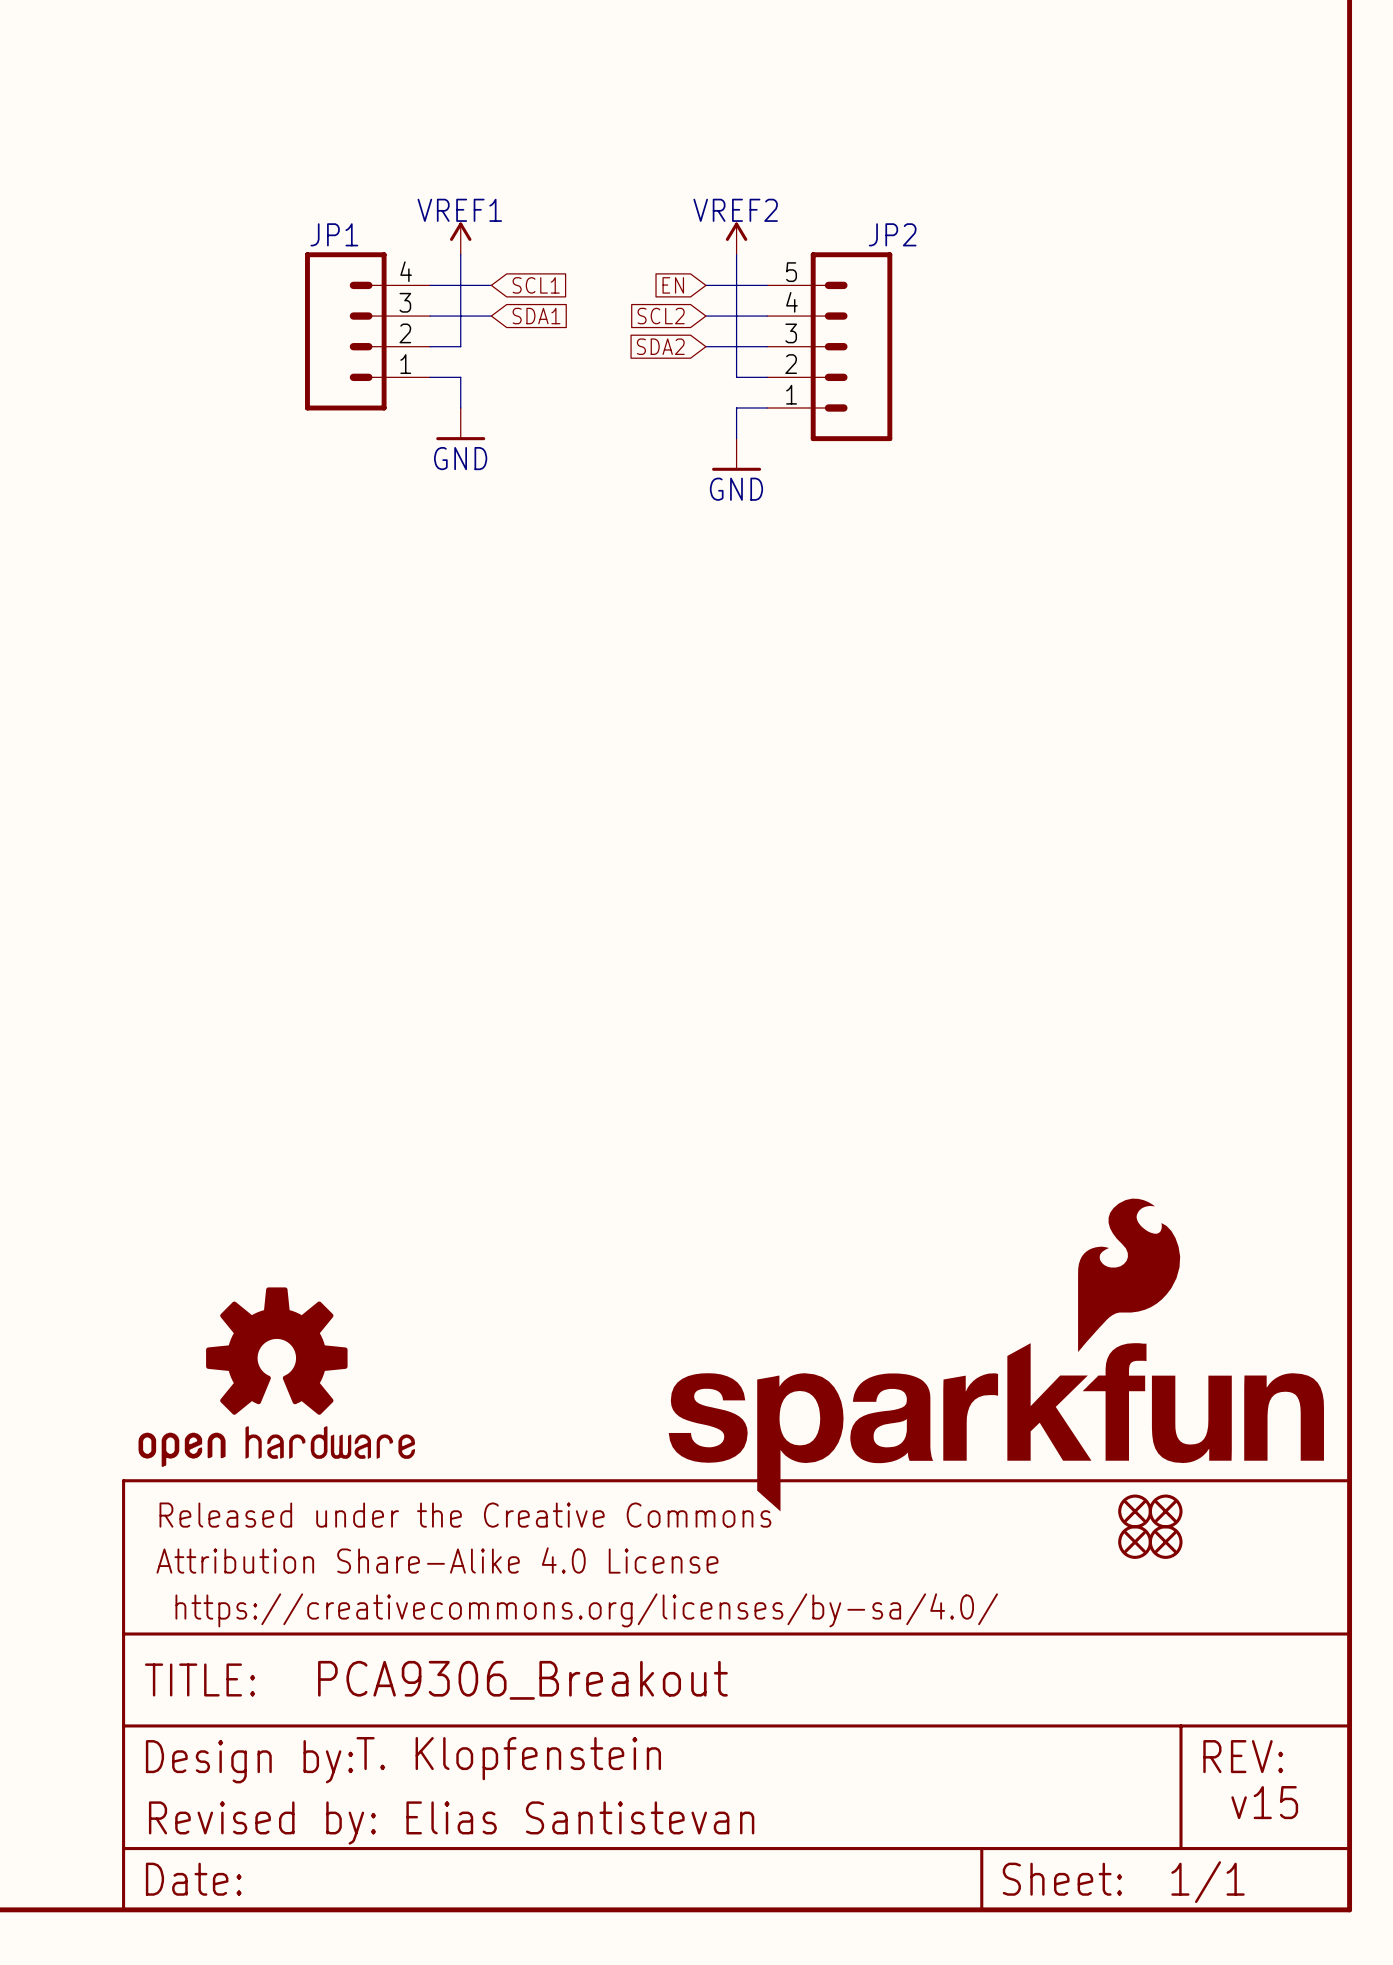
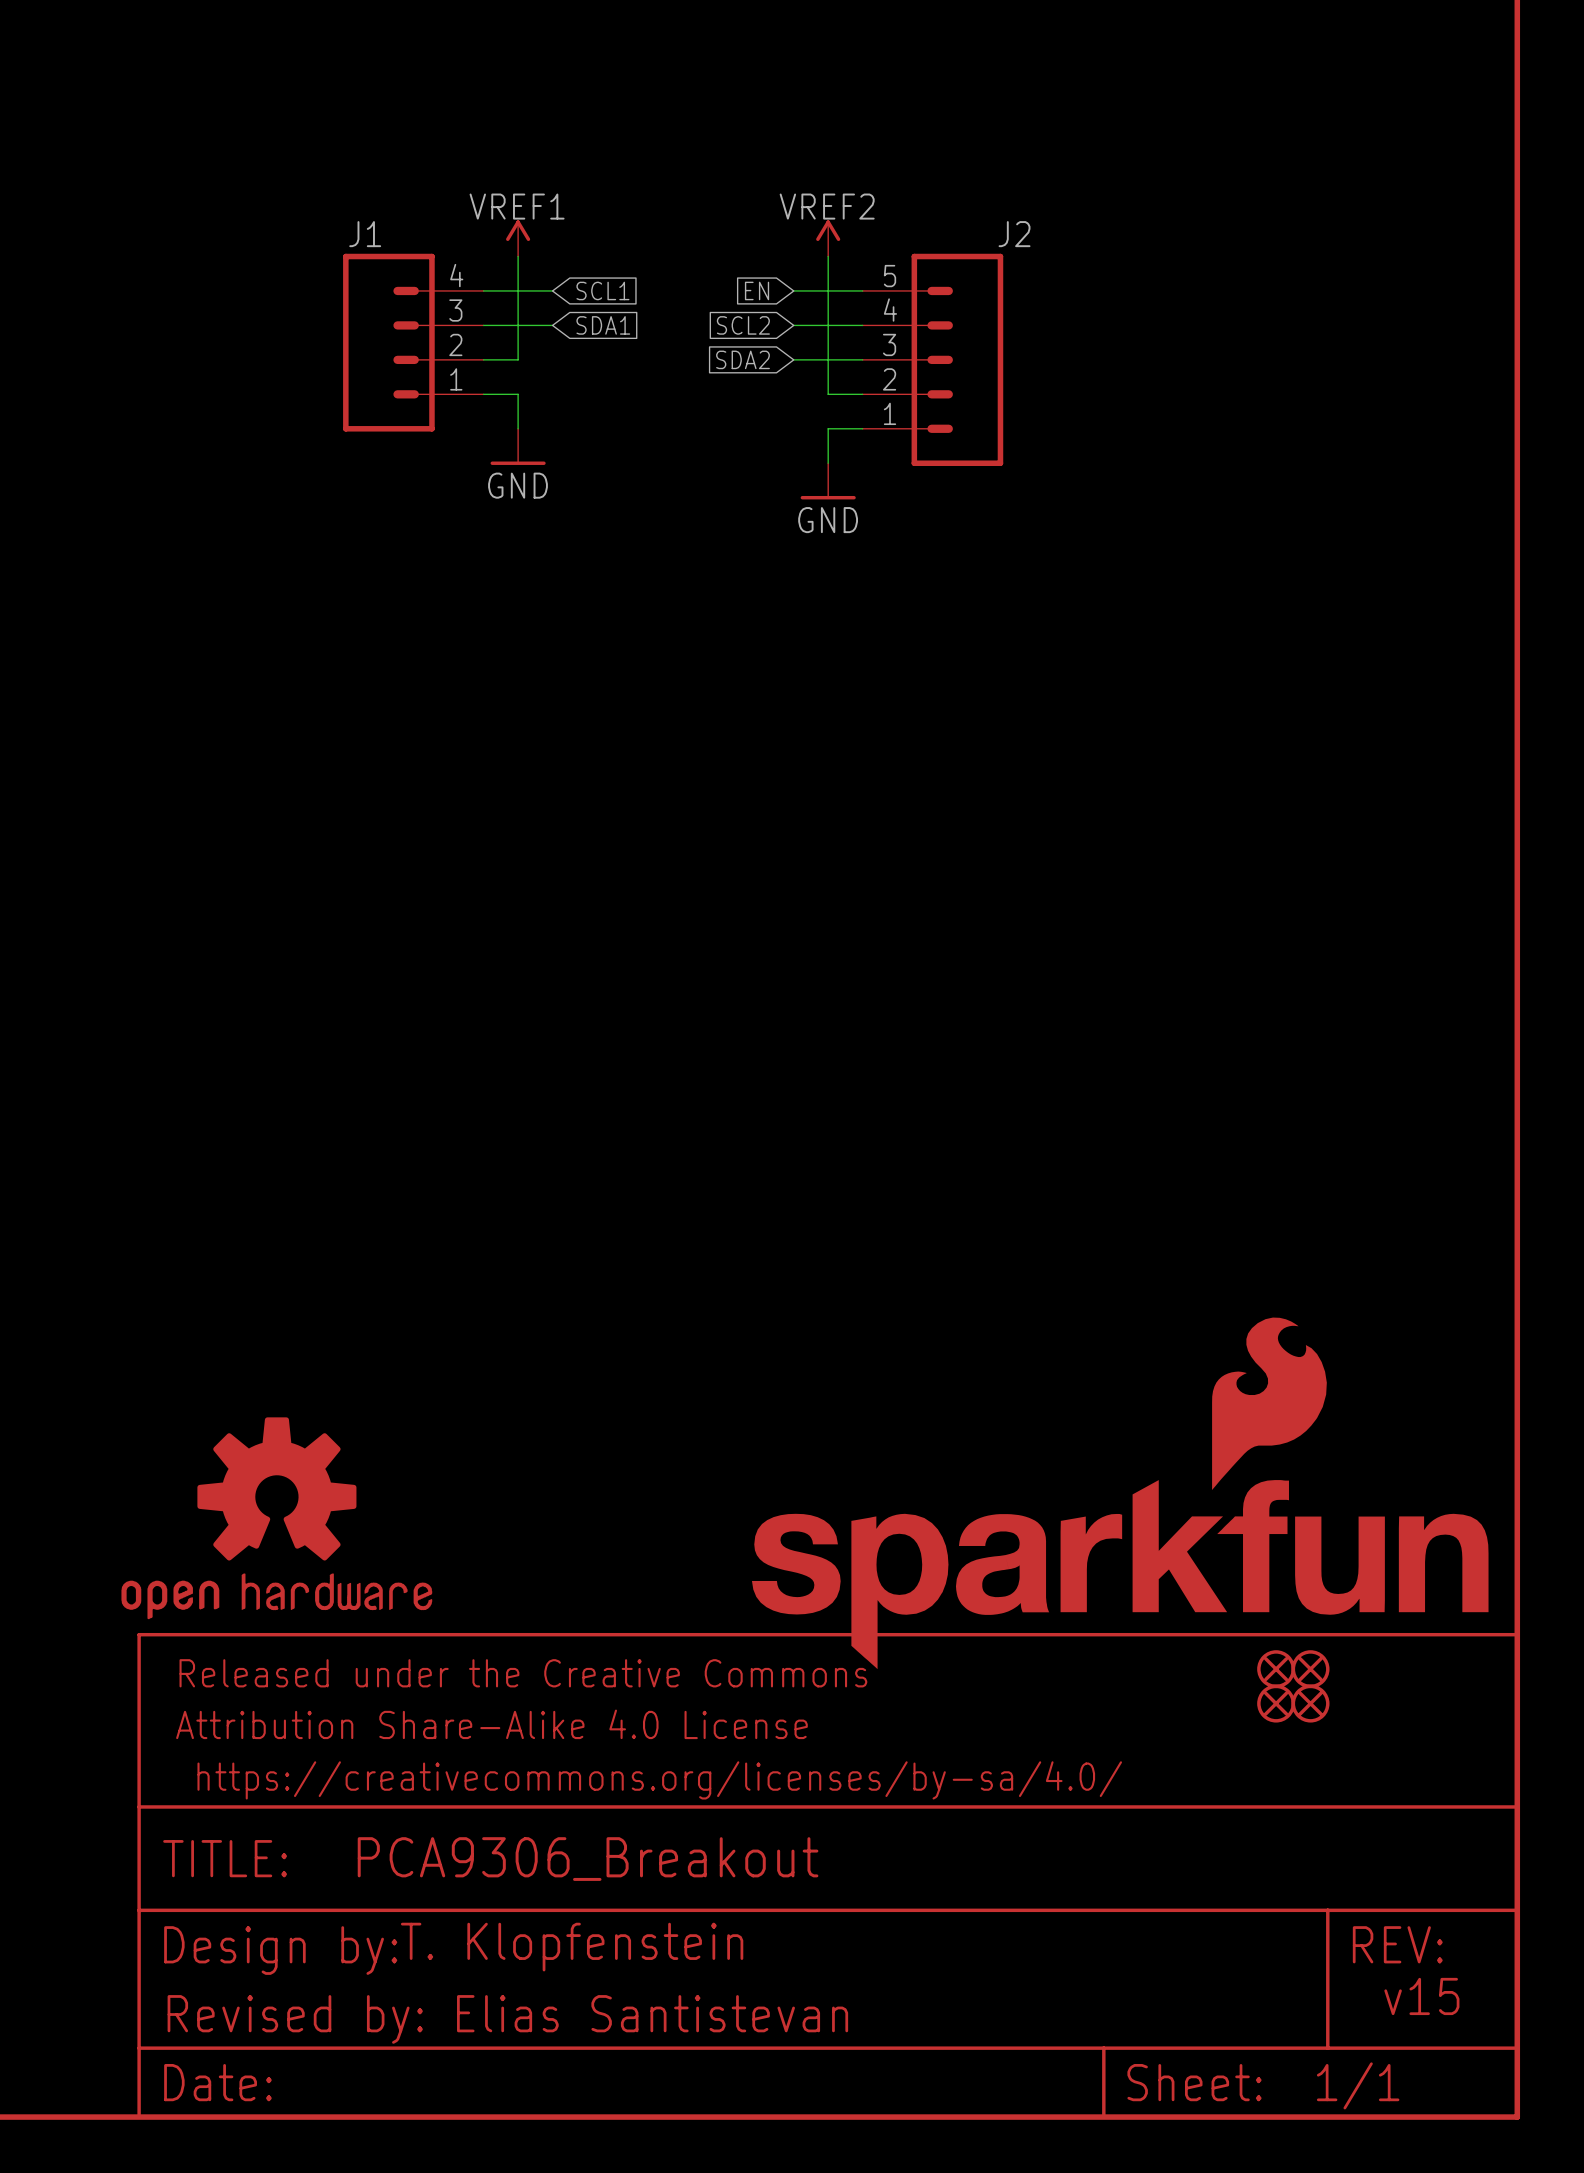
JP1 name: JP1 (334, 234) -> J1 (365, 234)
JP2 name: JP2 (892, 234) -> J2 (1014, 234)
part position: (276, 1377) -> (276, 1518)

